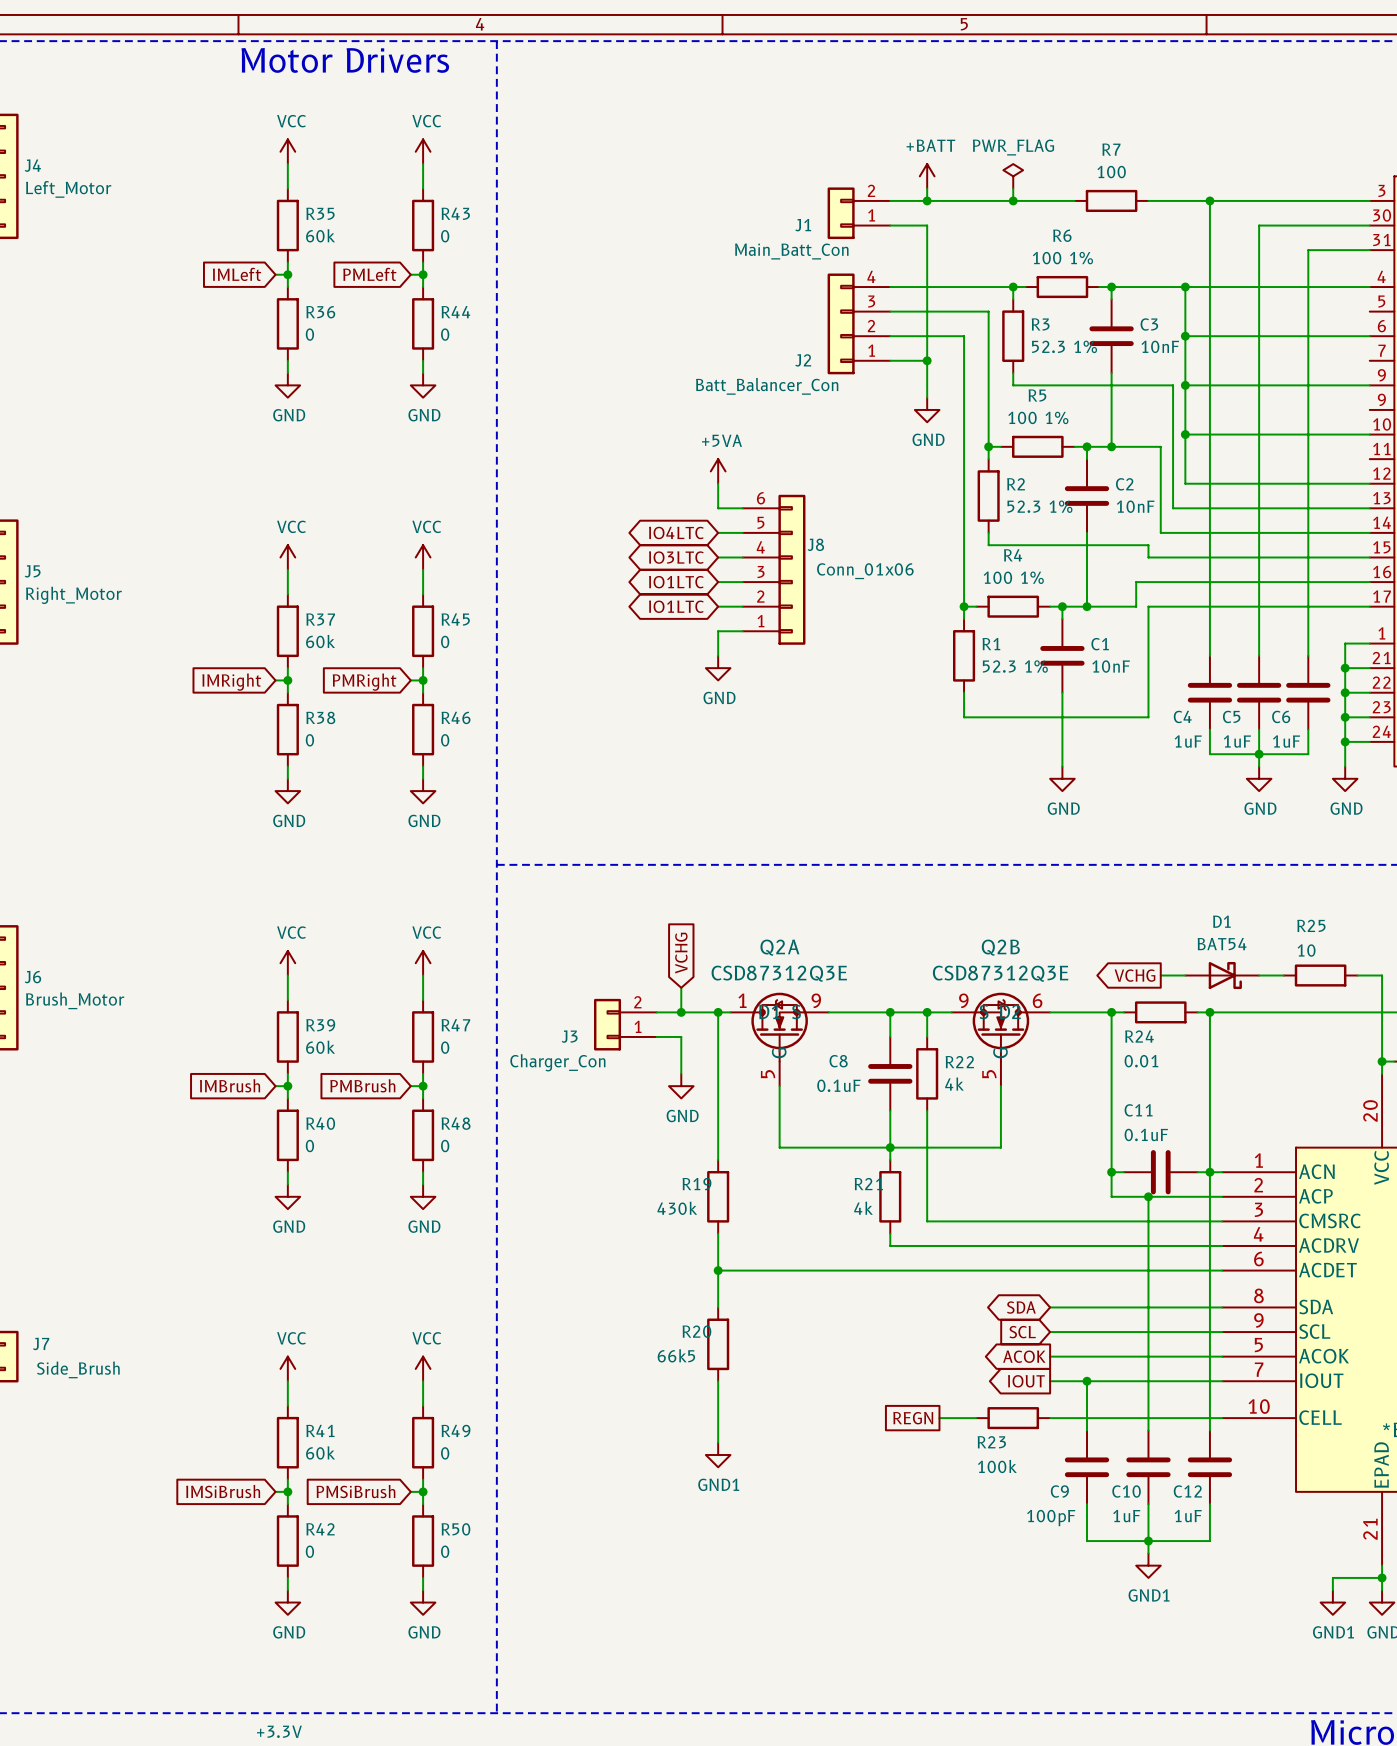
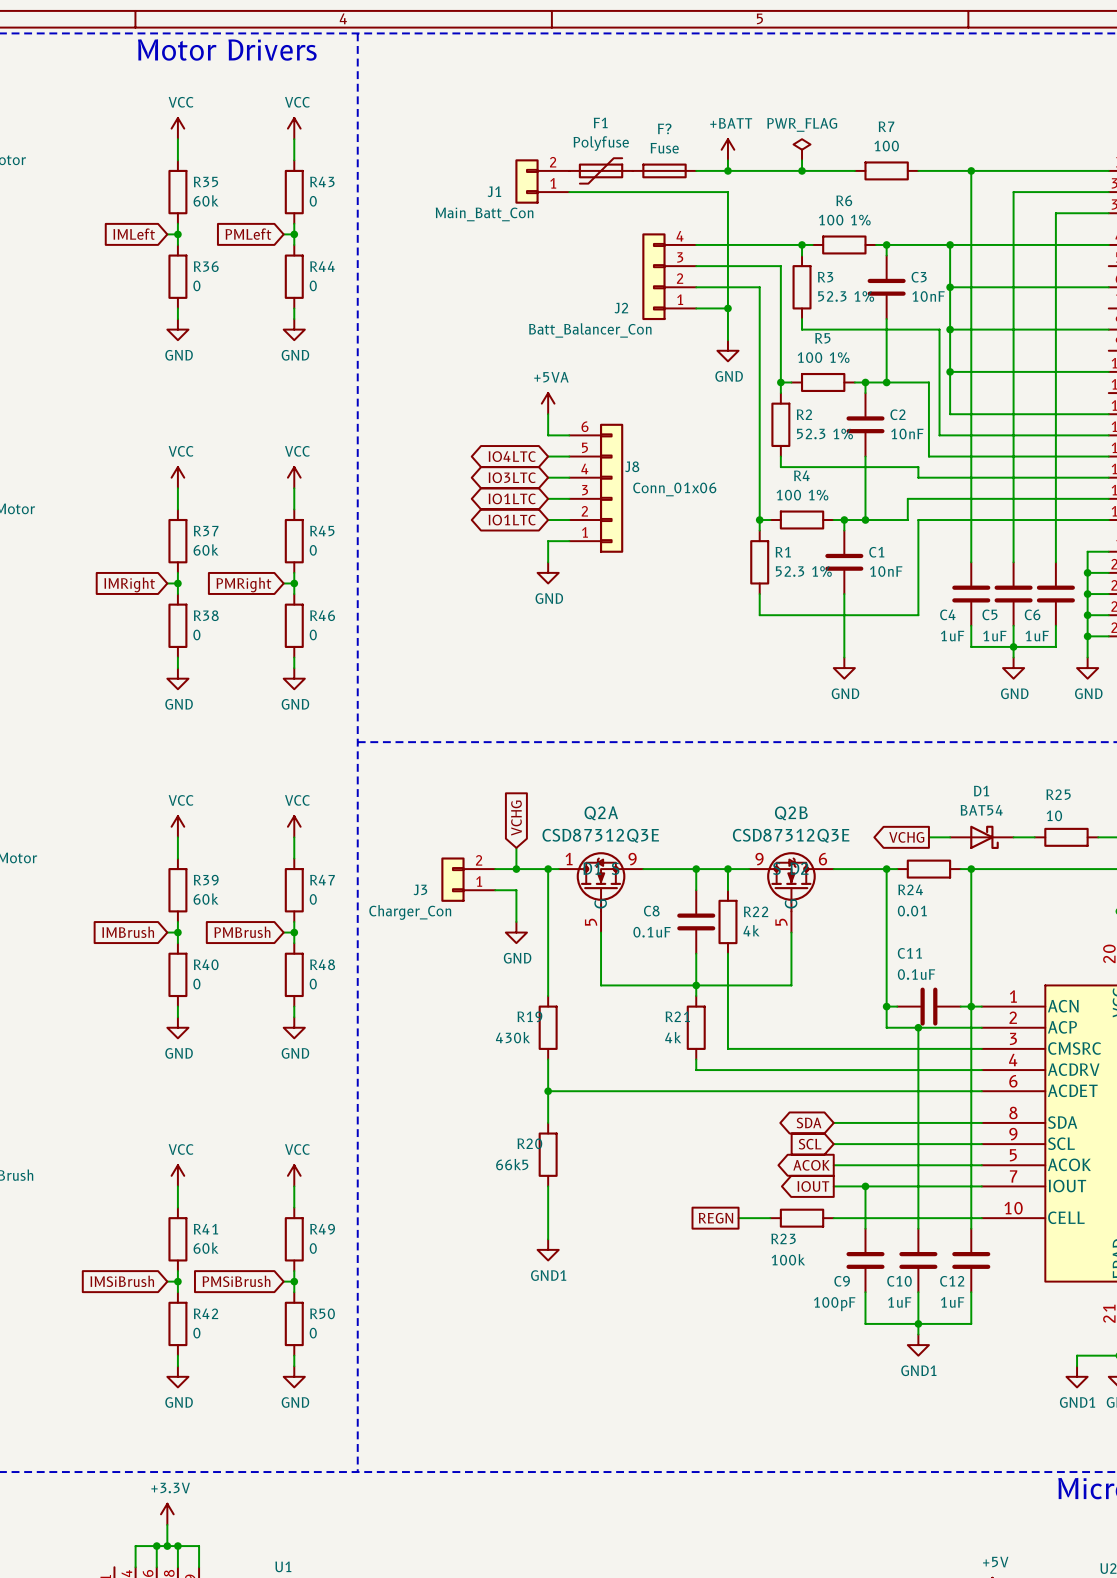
F1: none -> Polyfuse (601, 170)
F?: none -> Fuse (664, 170)
J1 position: (858, 213) -> (542, 181)
wire: none -> (569, 192) (696, 192)

